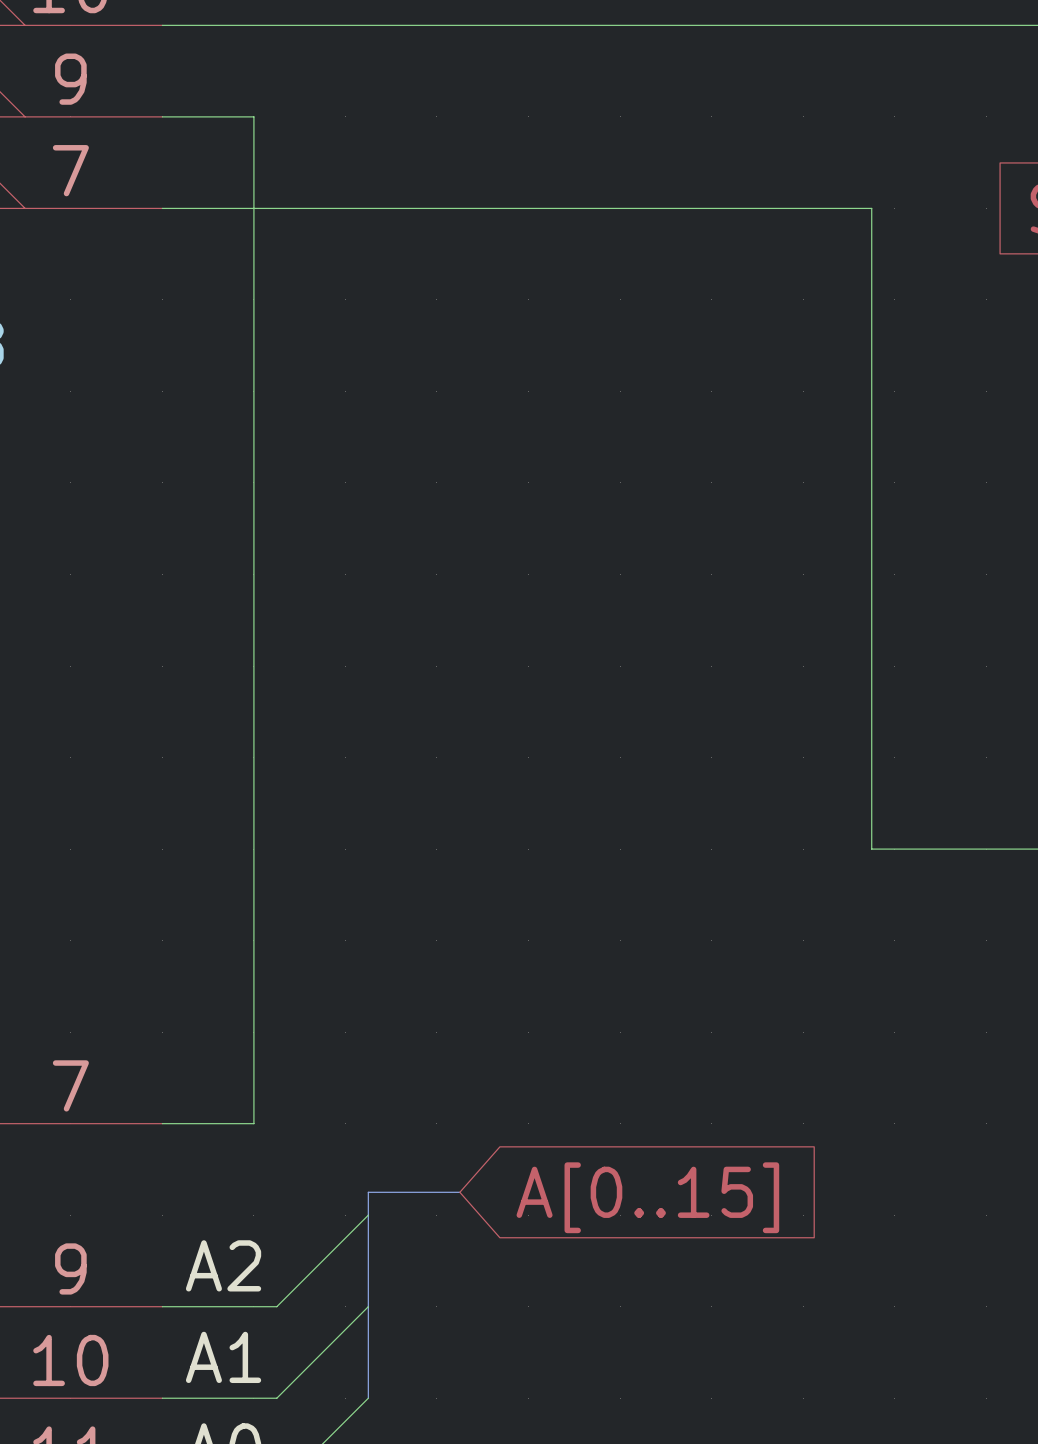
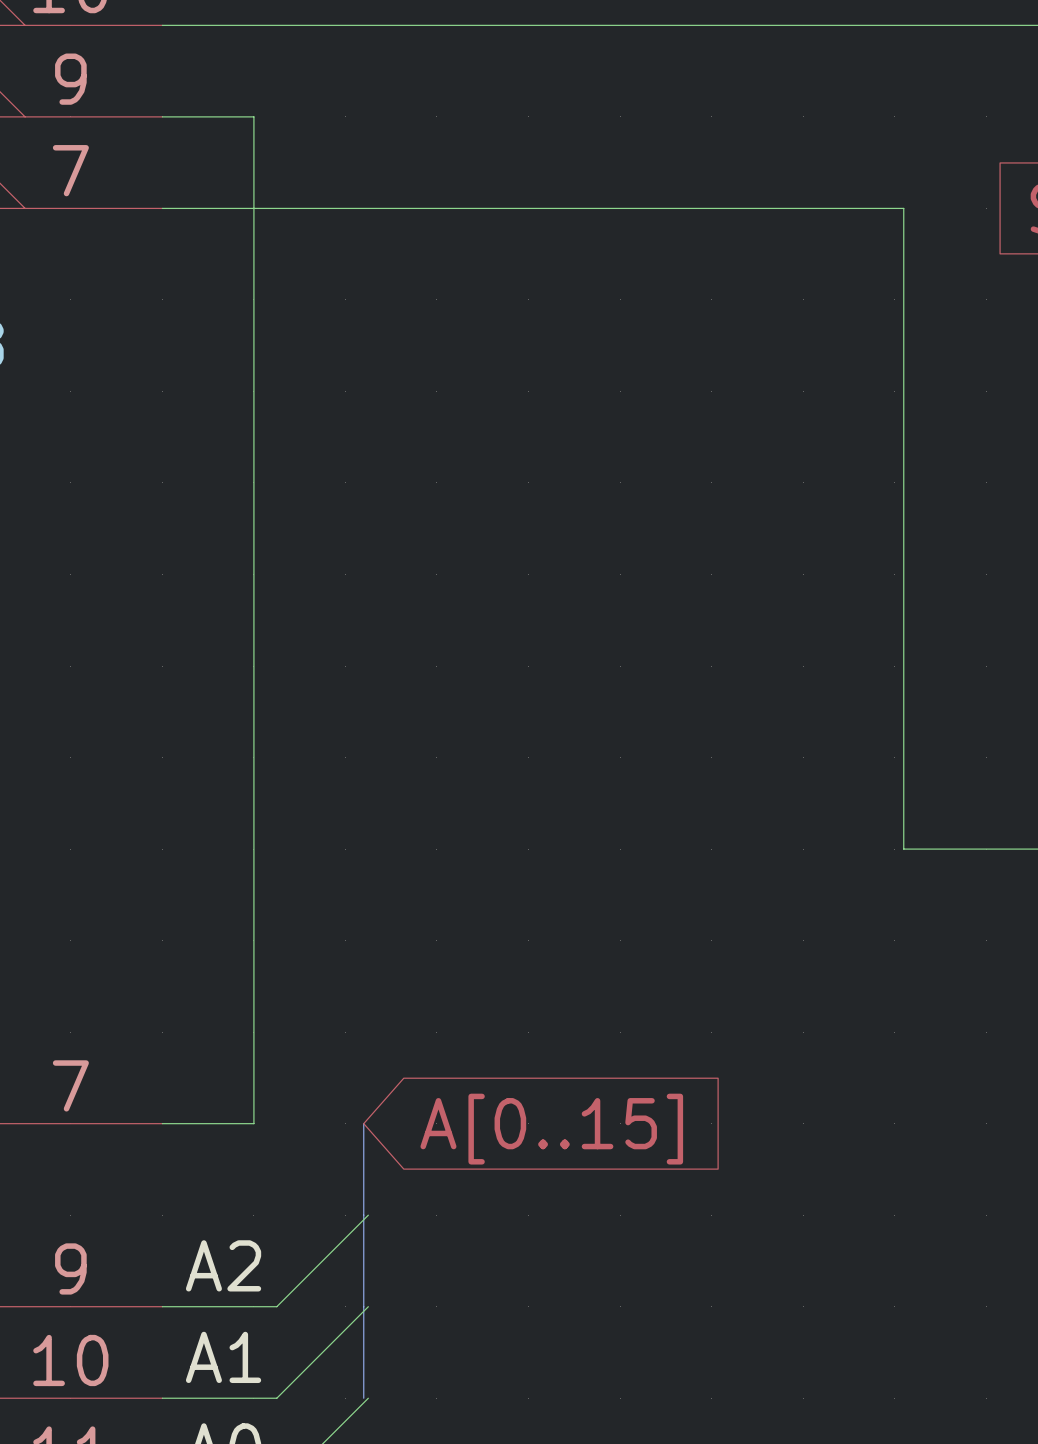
wire: (871, 208) (871, 849) (903, 849) -> (871, 208) (903, 208) (903, 849)
bus: none -> (363, 1123) (363, 1398)
bus: (459, 1192) (368, 1192) (368, 1398) -> none
global label position: A[0..15] (647, 1197) -> A[0..15] (551, 1129)

